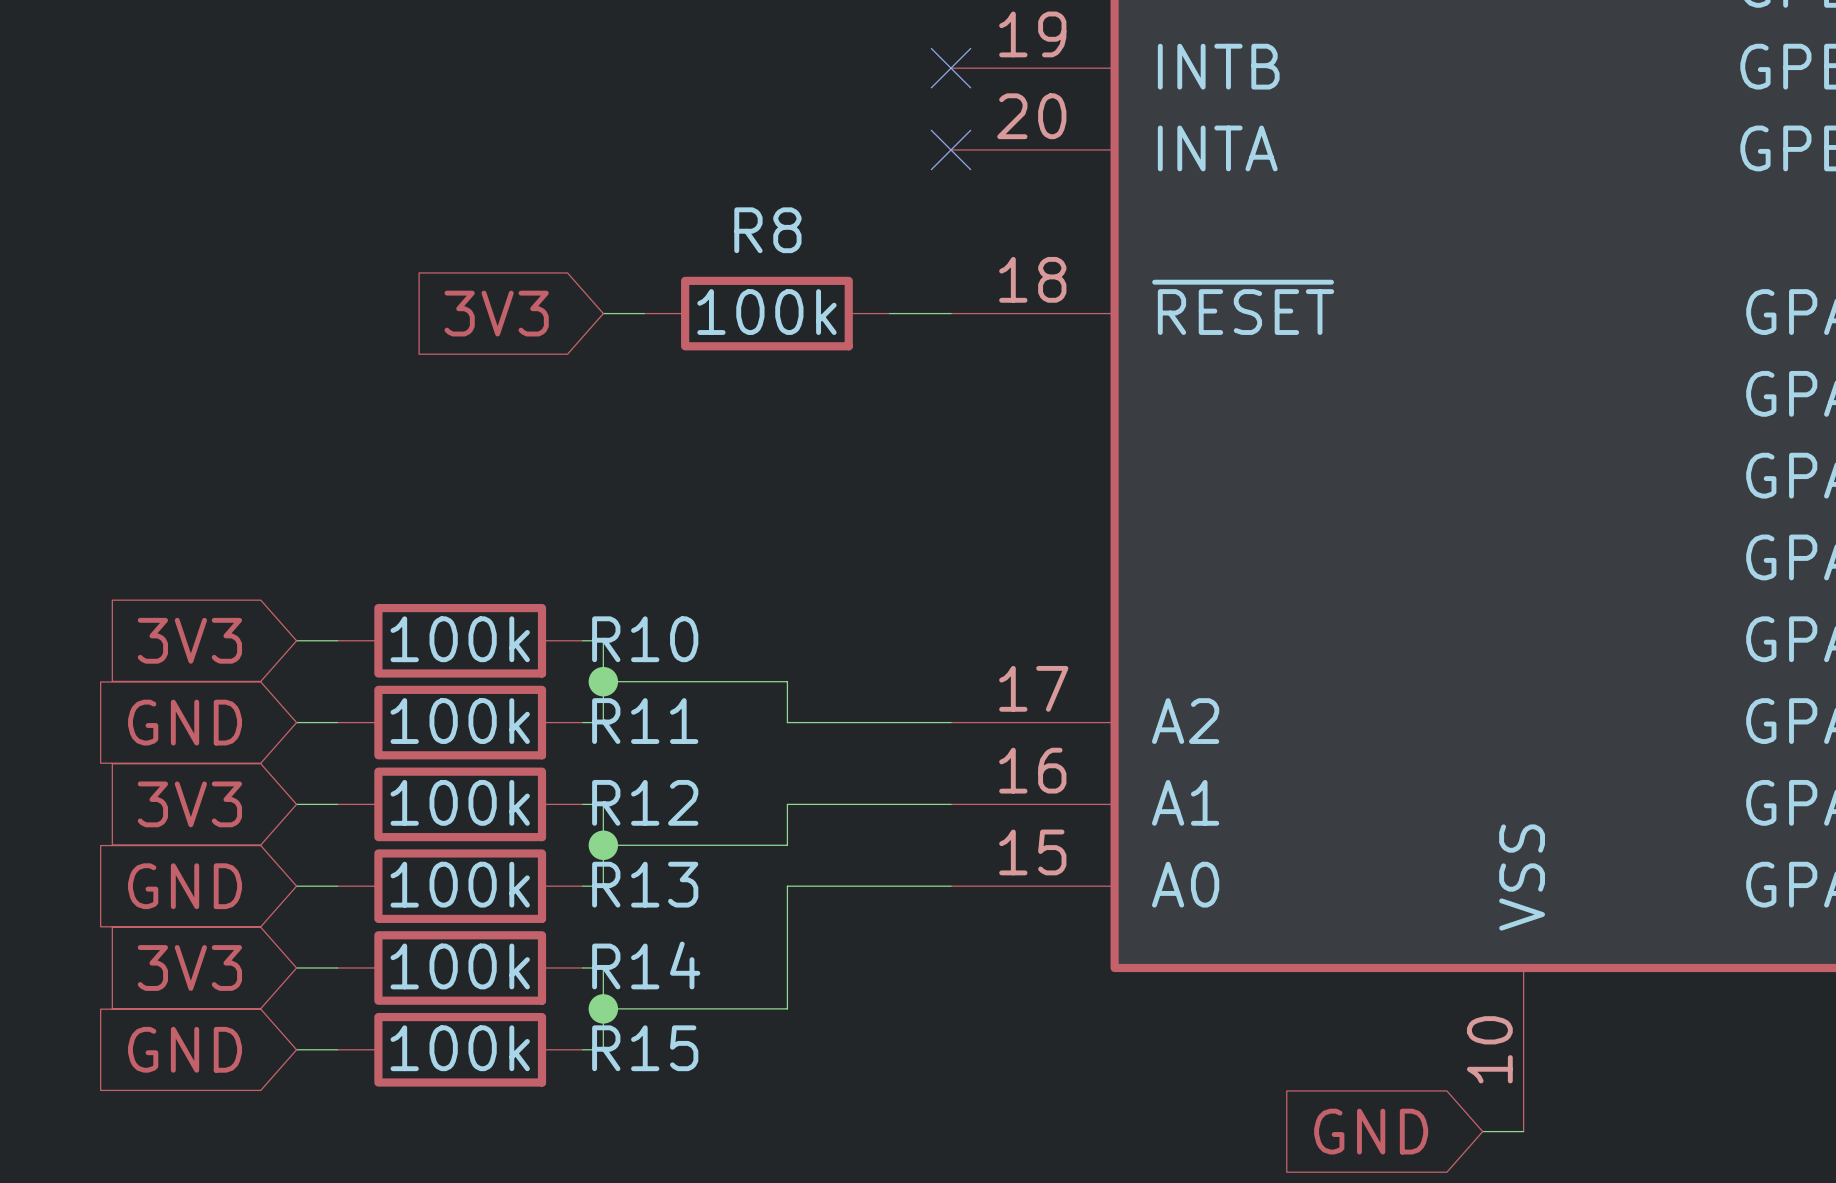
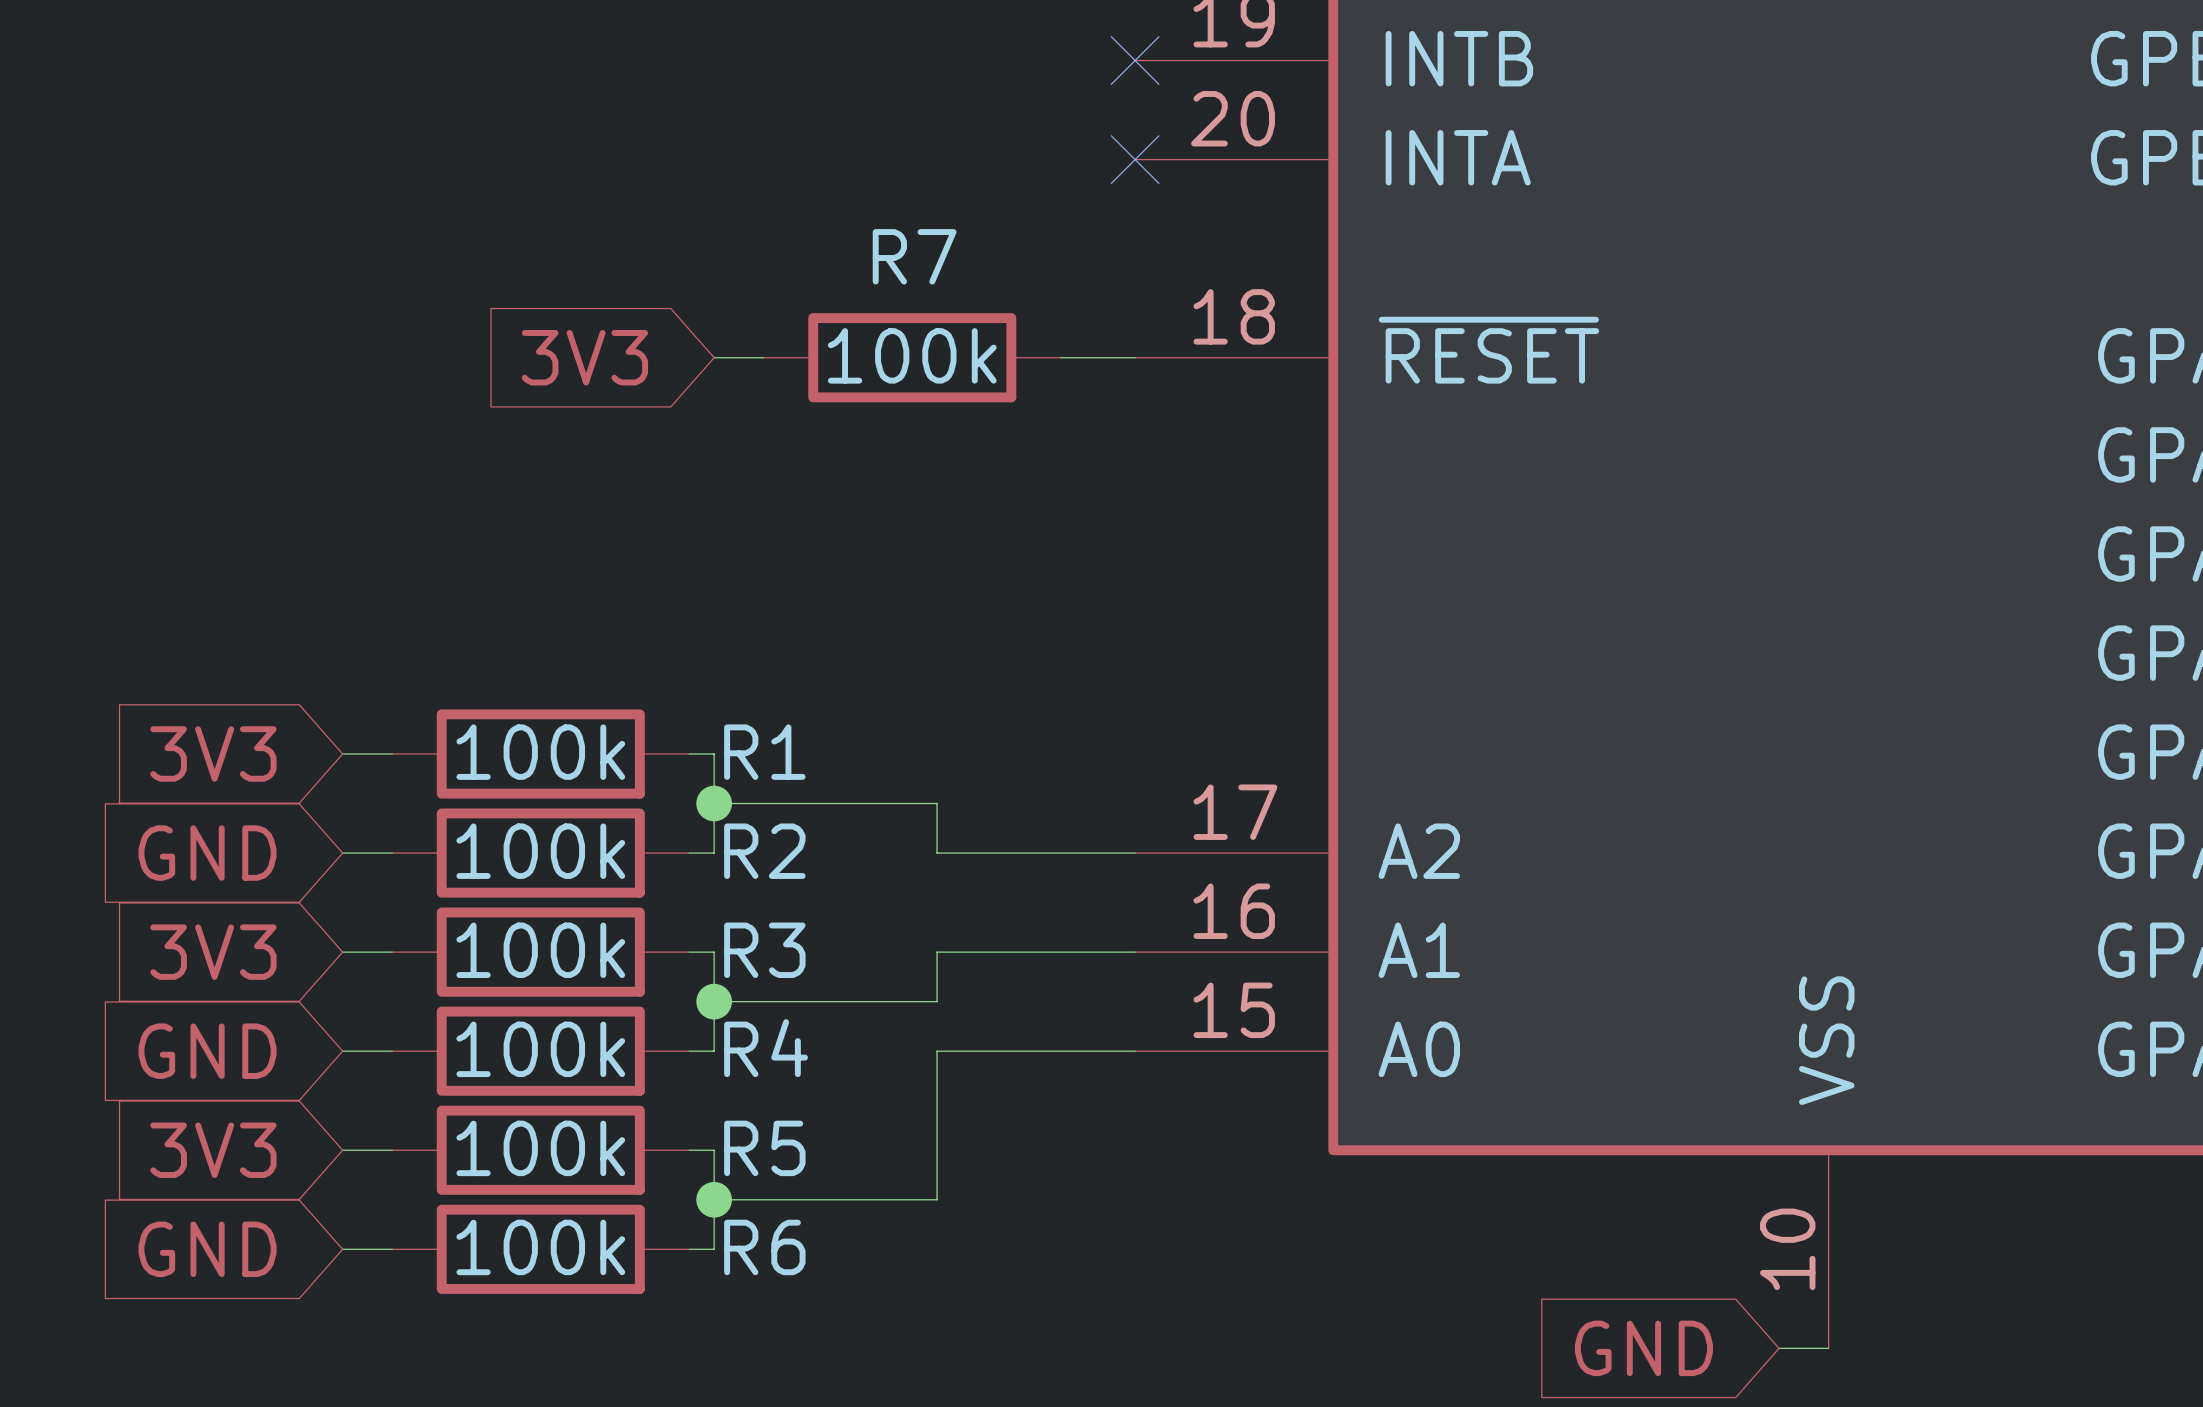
R8 name: R8 (767, 230) -> R7 (914, 256)
R10 name: R10 (645, 639) -> R1 (764, 752)
R11 name: R11 (645, 721) -> R2 (764, 851)
R12 name: R12 (645, 802) -> R3 (764, 950)
R13 name: R13 (645, 884) -> R4 (766, 1048)
R14 name: R14 (646, 965) -> R5 (764, 1148)
R15 name: R15 (645, 1048) -> R6 (764, 1247)

